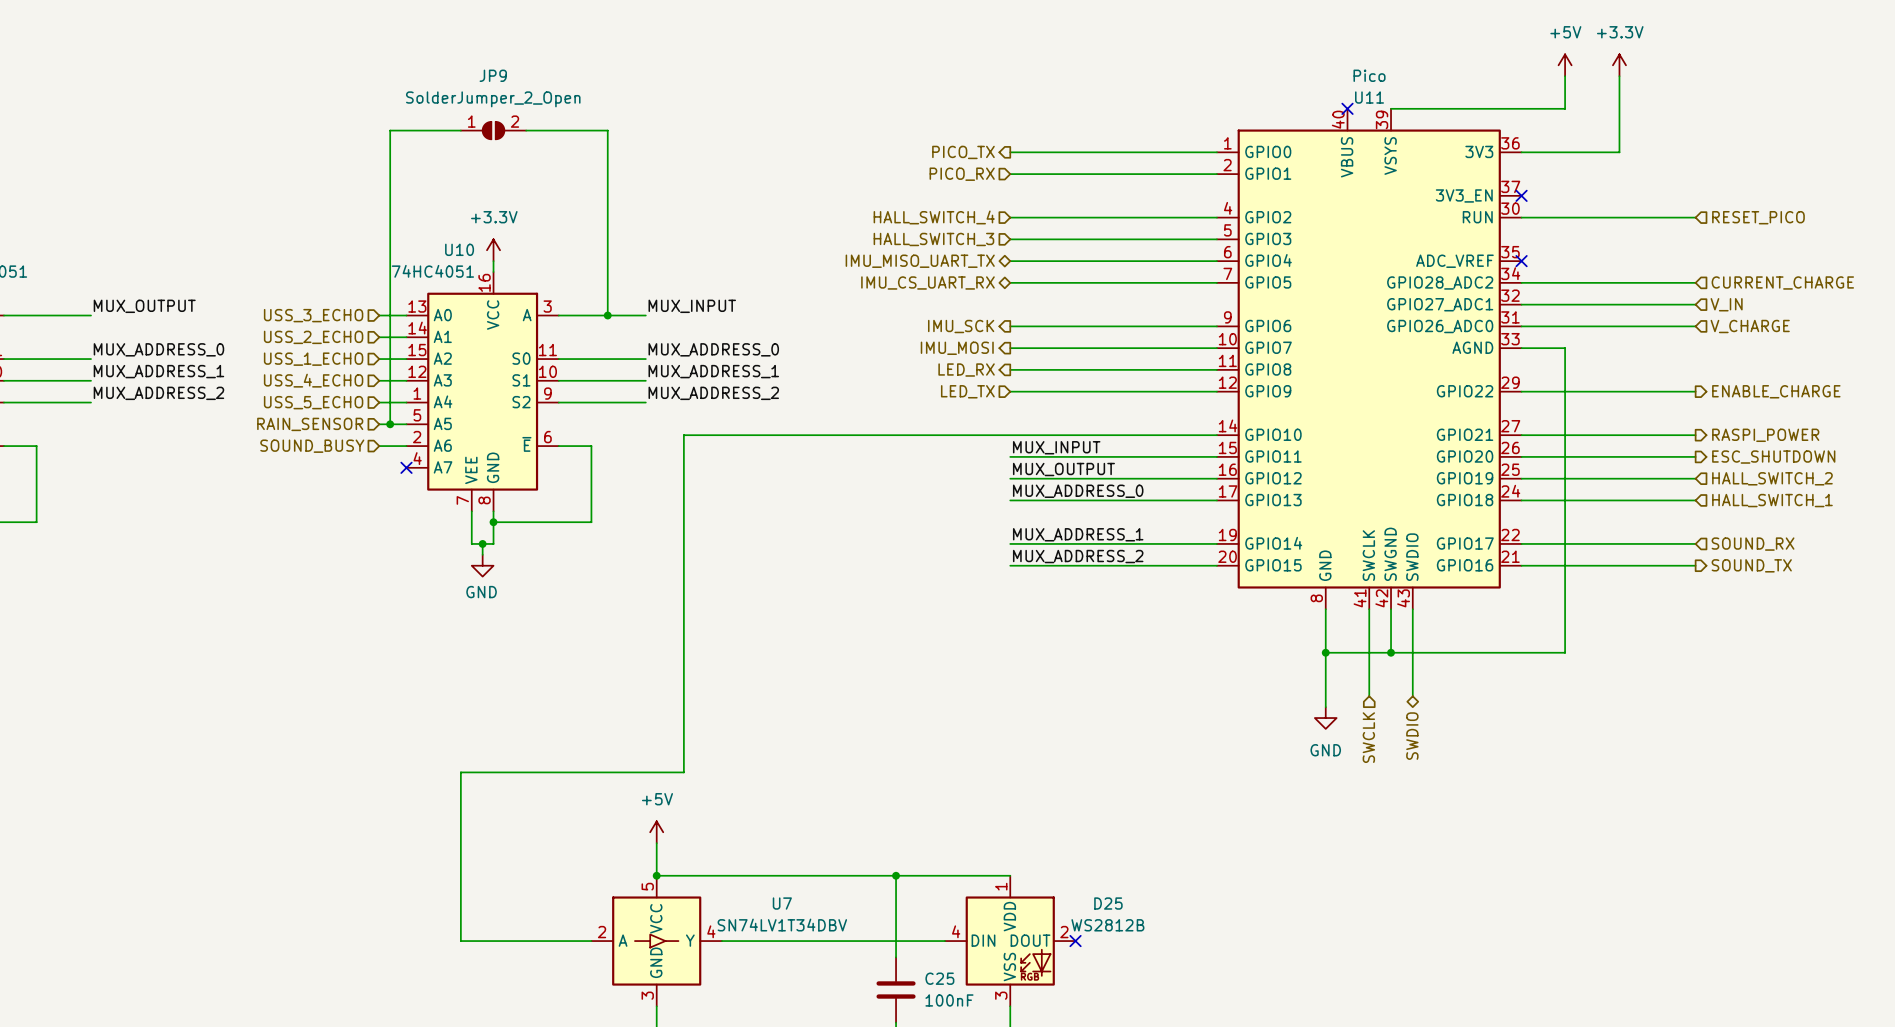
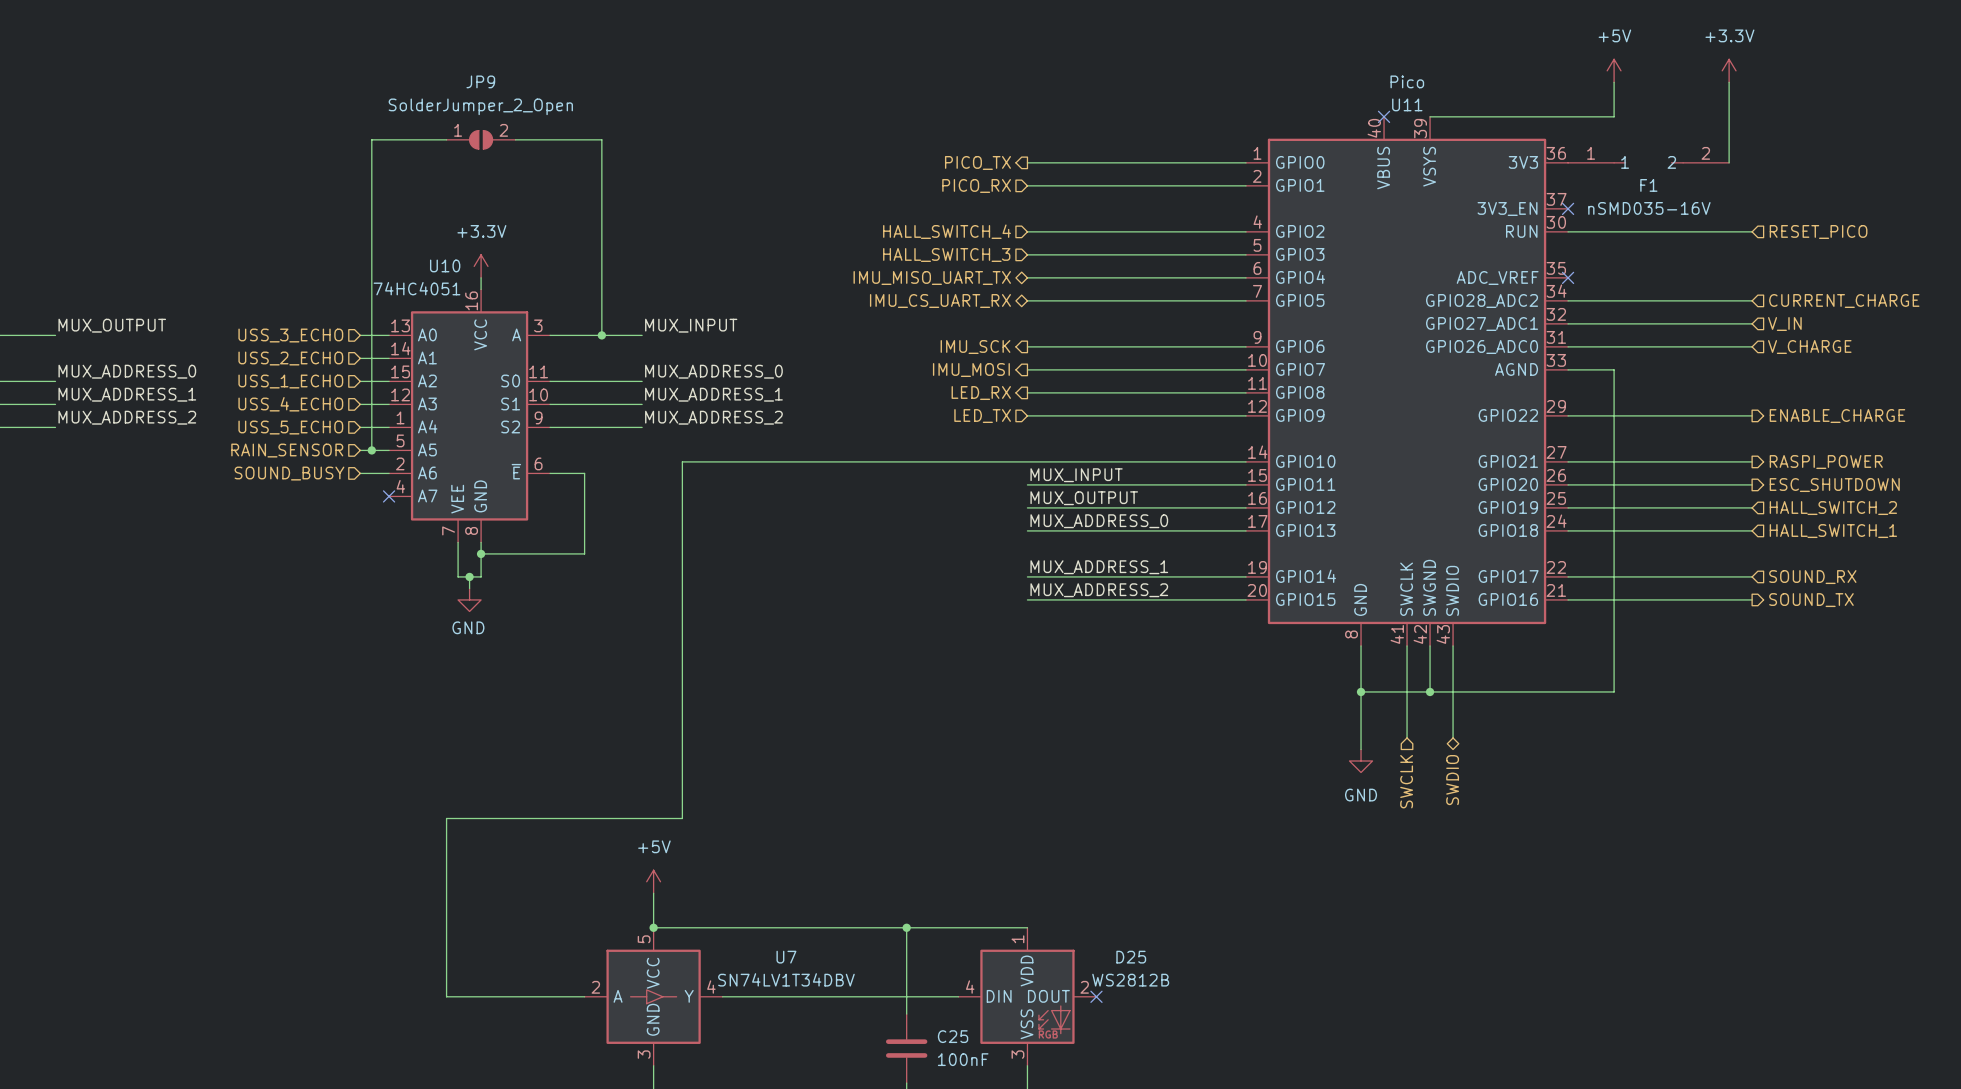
power symbol position: +3.3V (1619, 65) -> +3.3V (1729, 70)
wire: (1619, 76) (1619, 152) (1521, 152) -> none
wire: none -> (1729, 82) (1729, 162)
F1: none -> nSMD035-16V (1648, 162)

